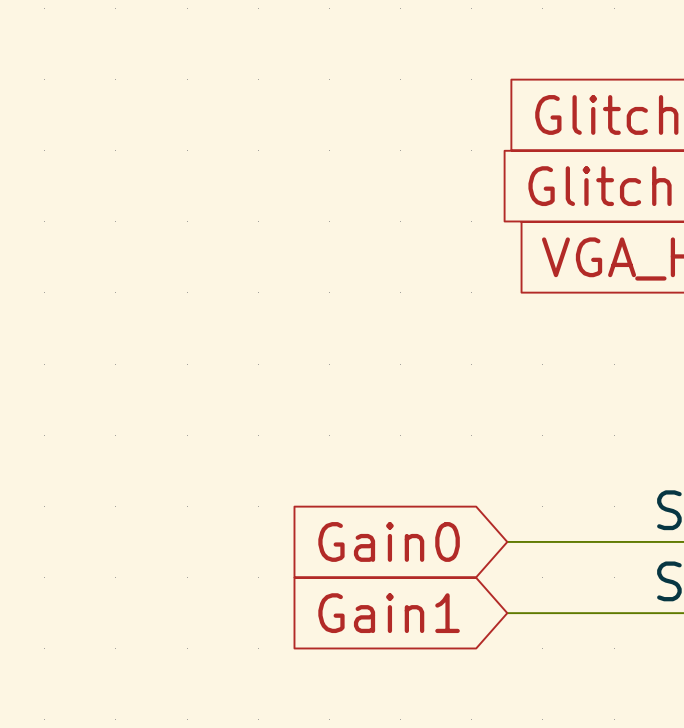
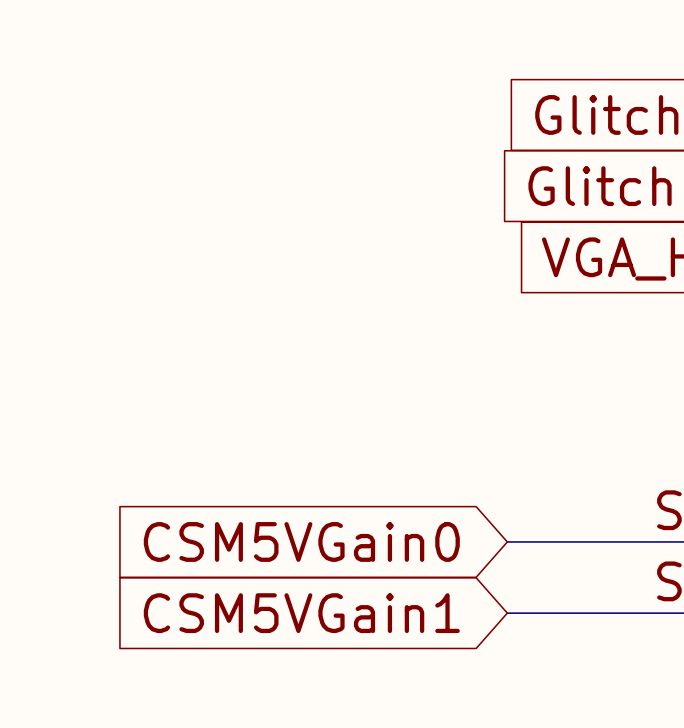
global label: Gain0 (389, 541) -> CSM5VGain0 (301, 541)
global label: Gain1 (389, 613) -> CSM5VGain1 (301, 613)

